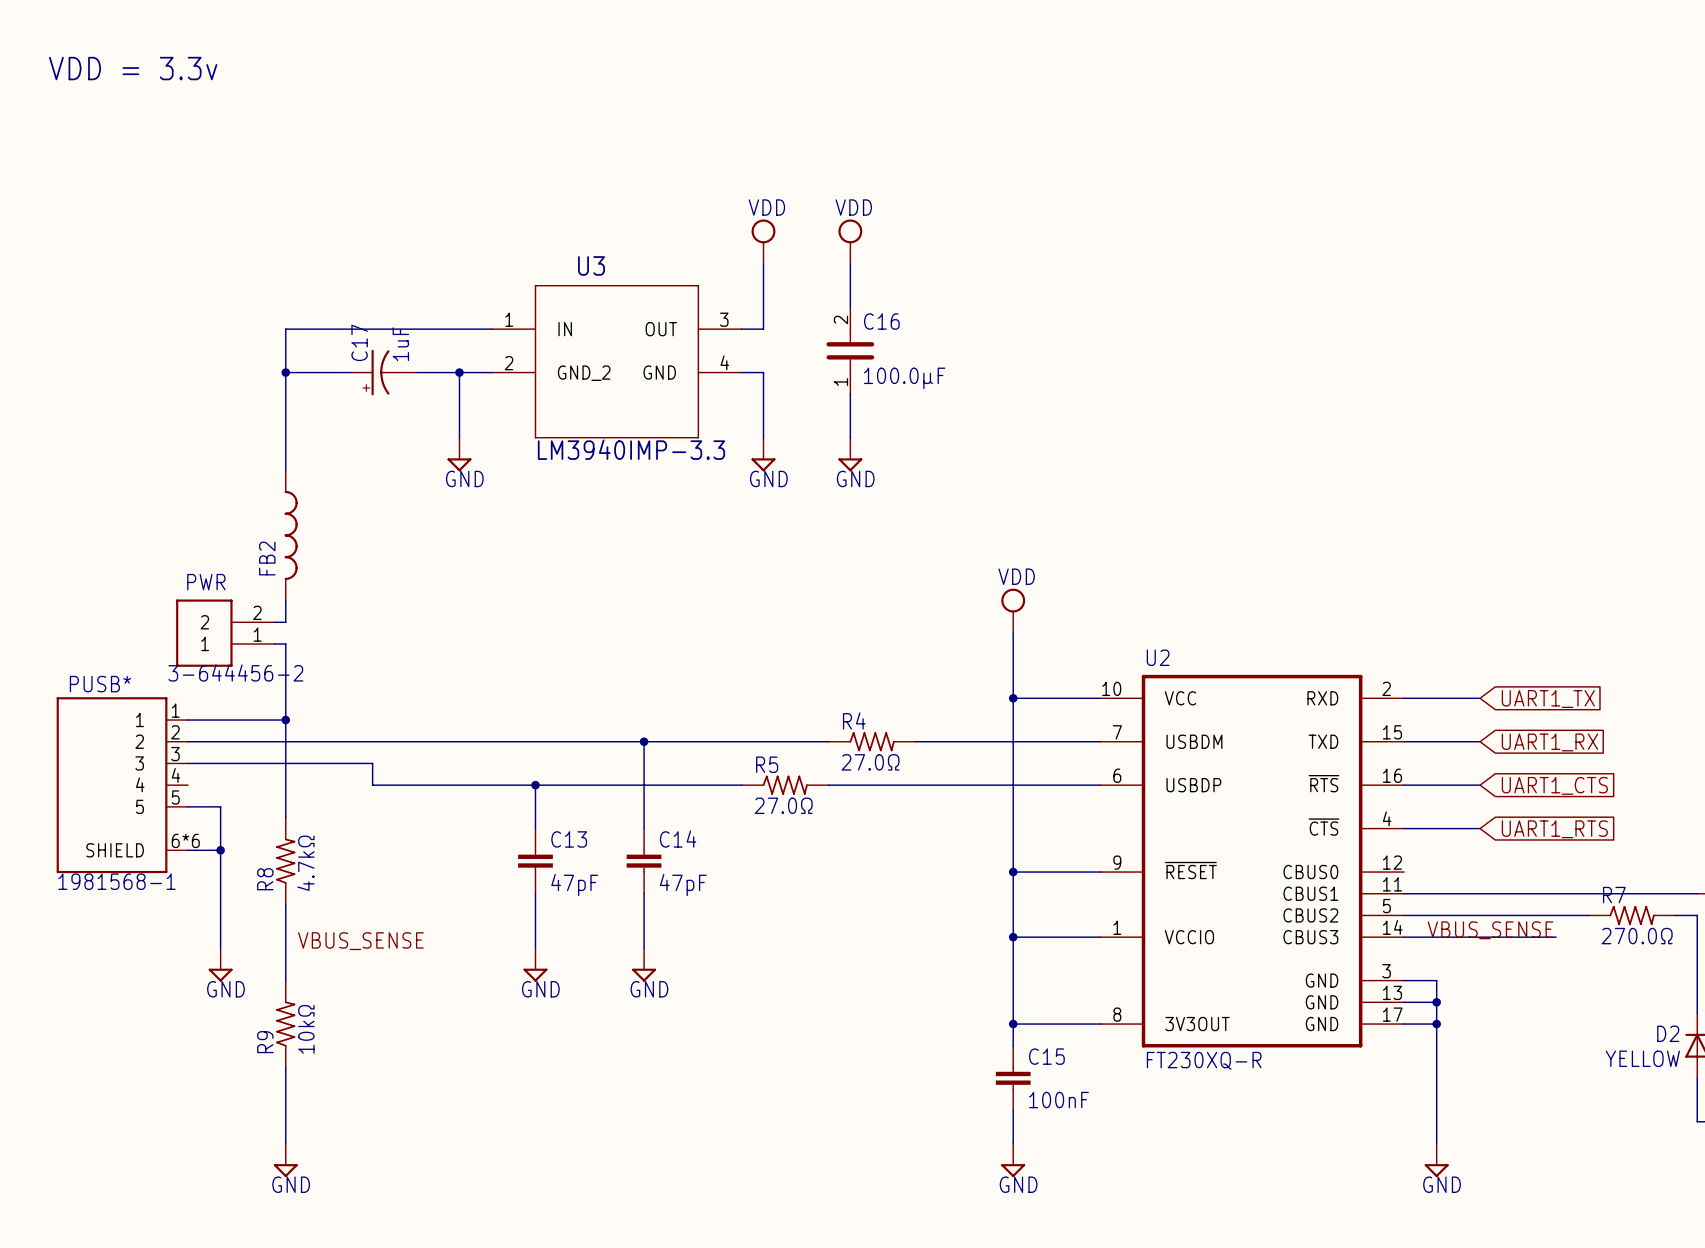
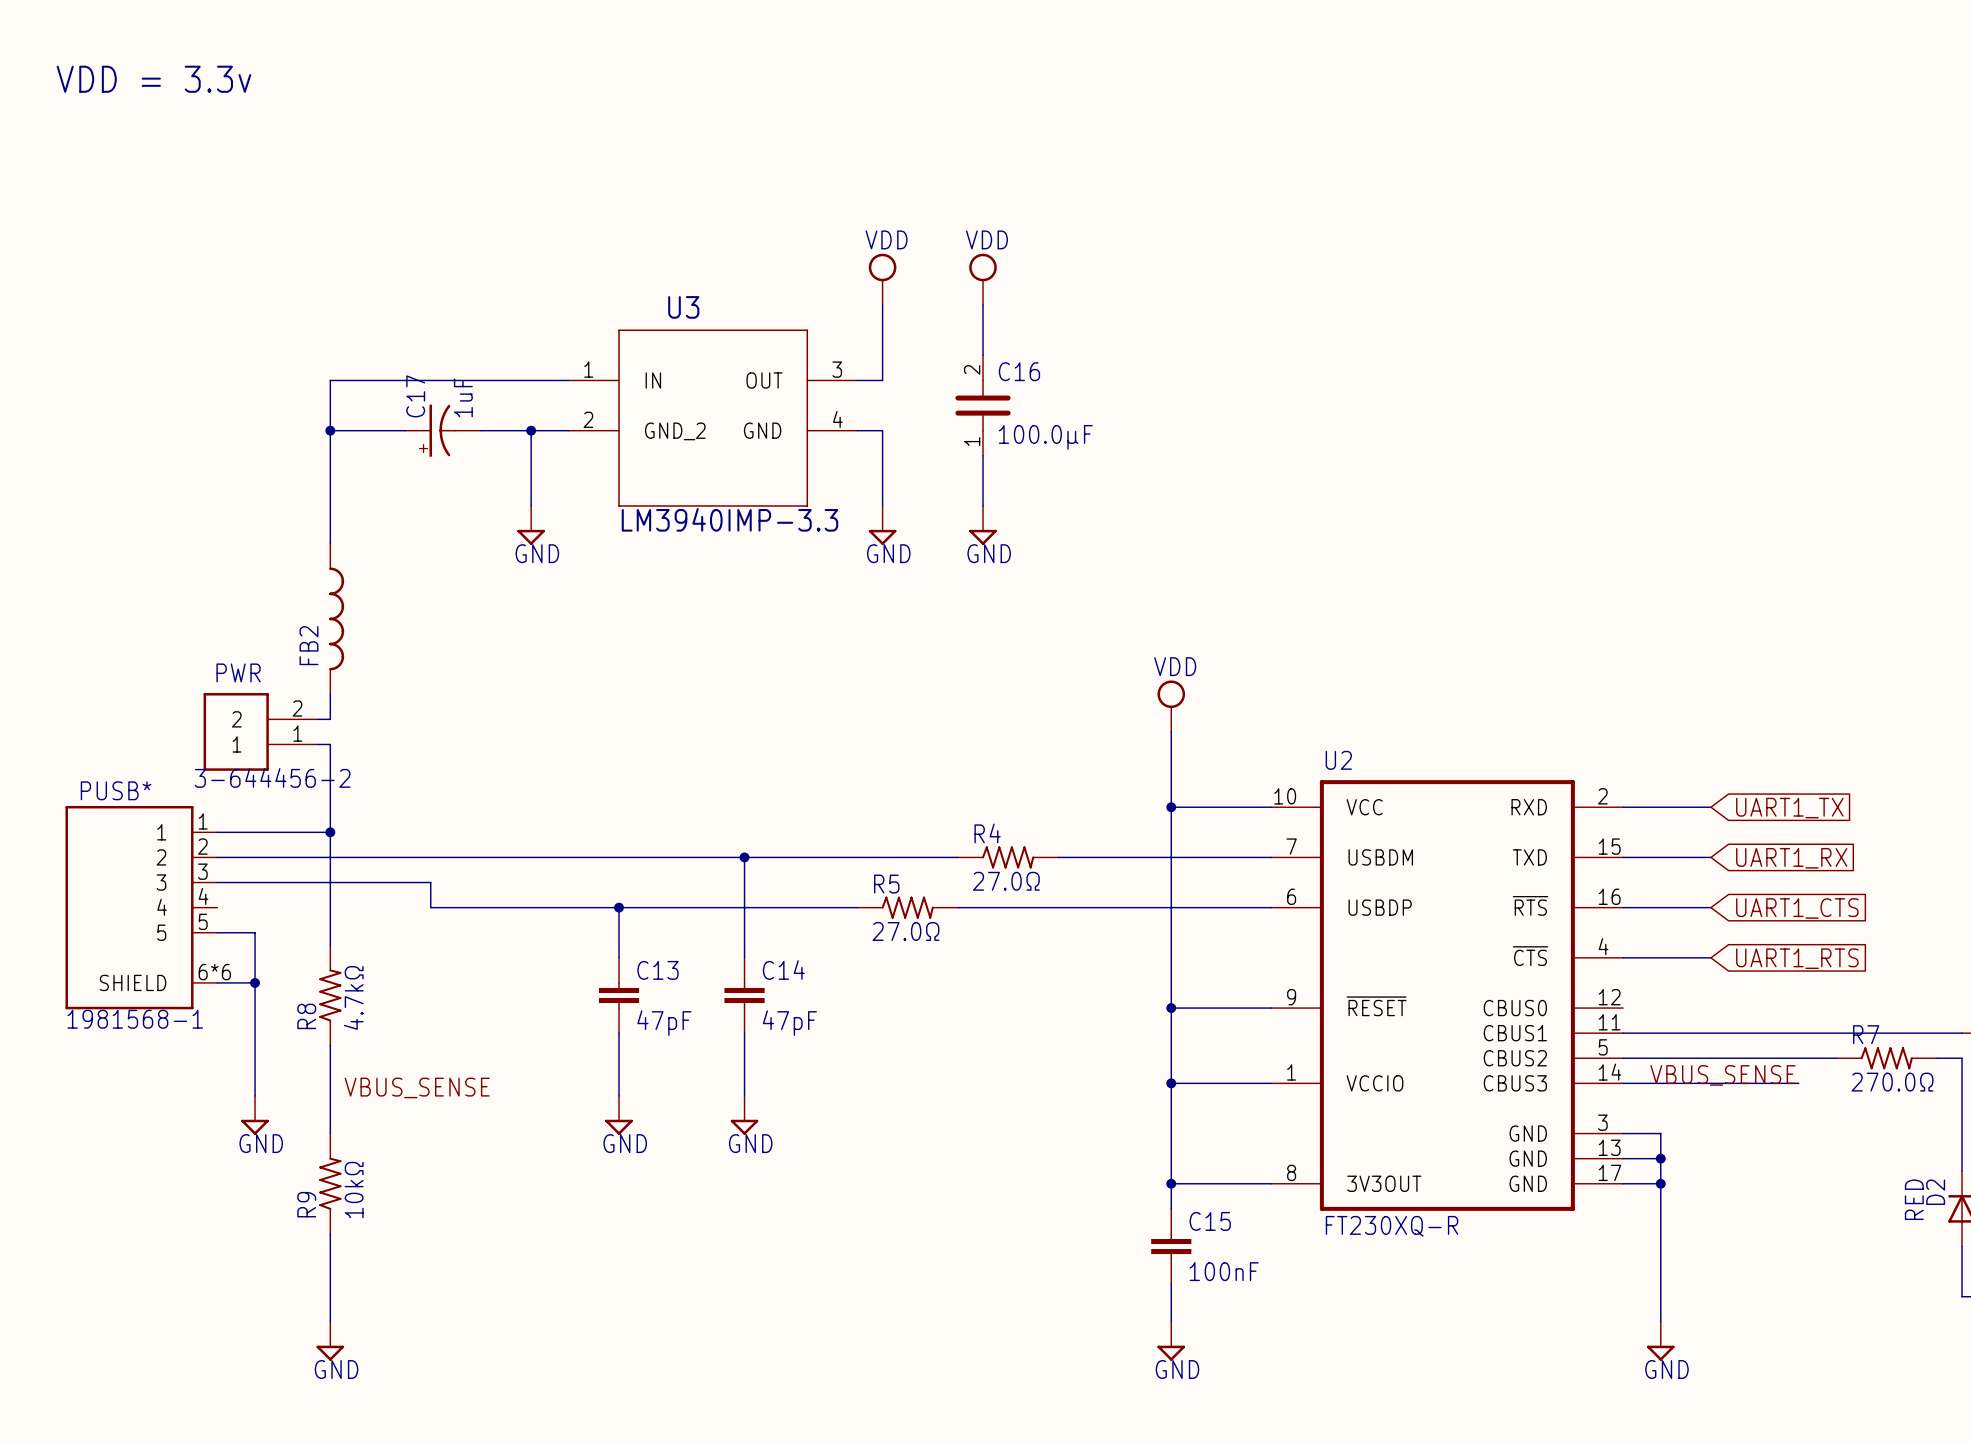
D2 name rotation: 0° (1668, 1033) -> 90° counterclockwise (1935, 1192)
D2 value: YELLOW (1642, 1058) -> RED (1914, 1199)

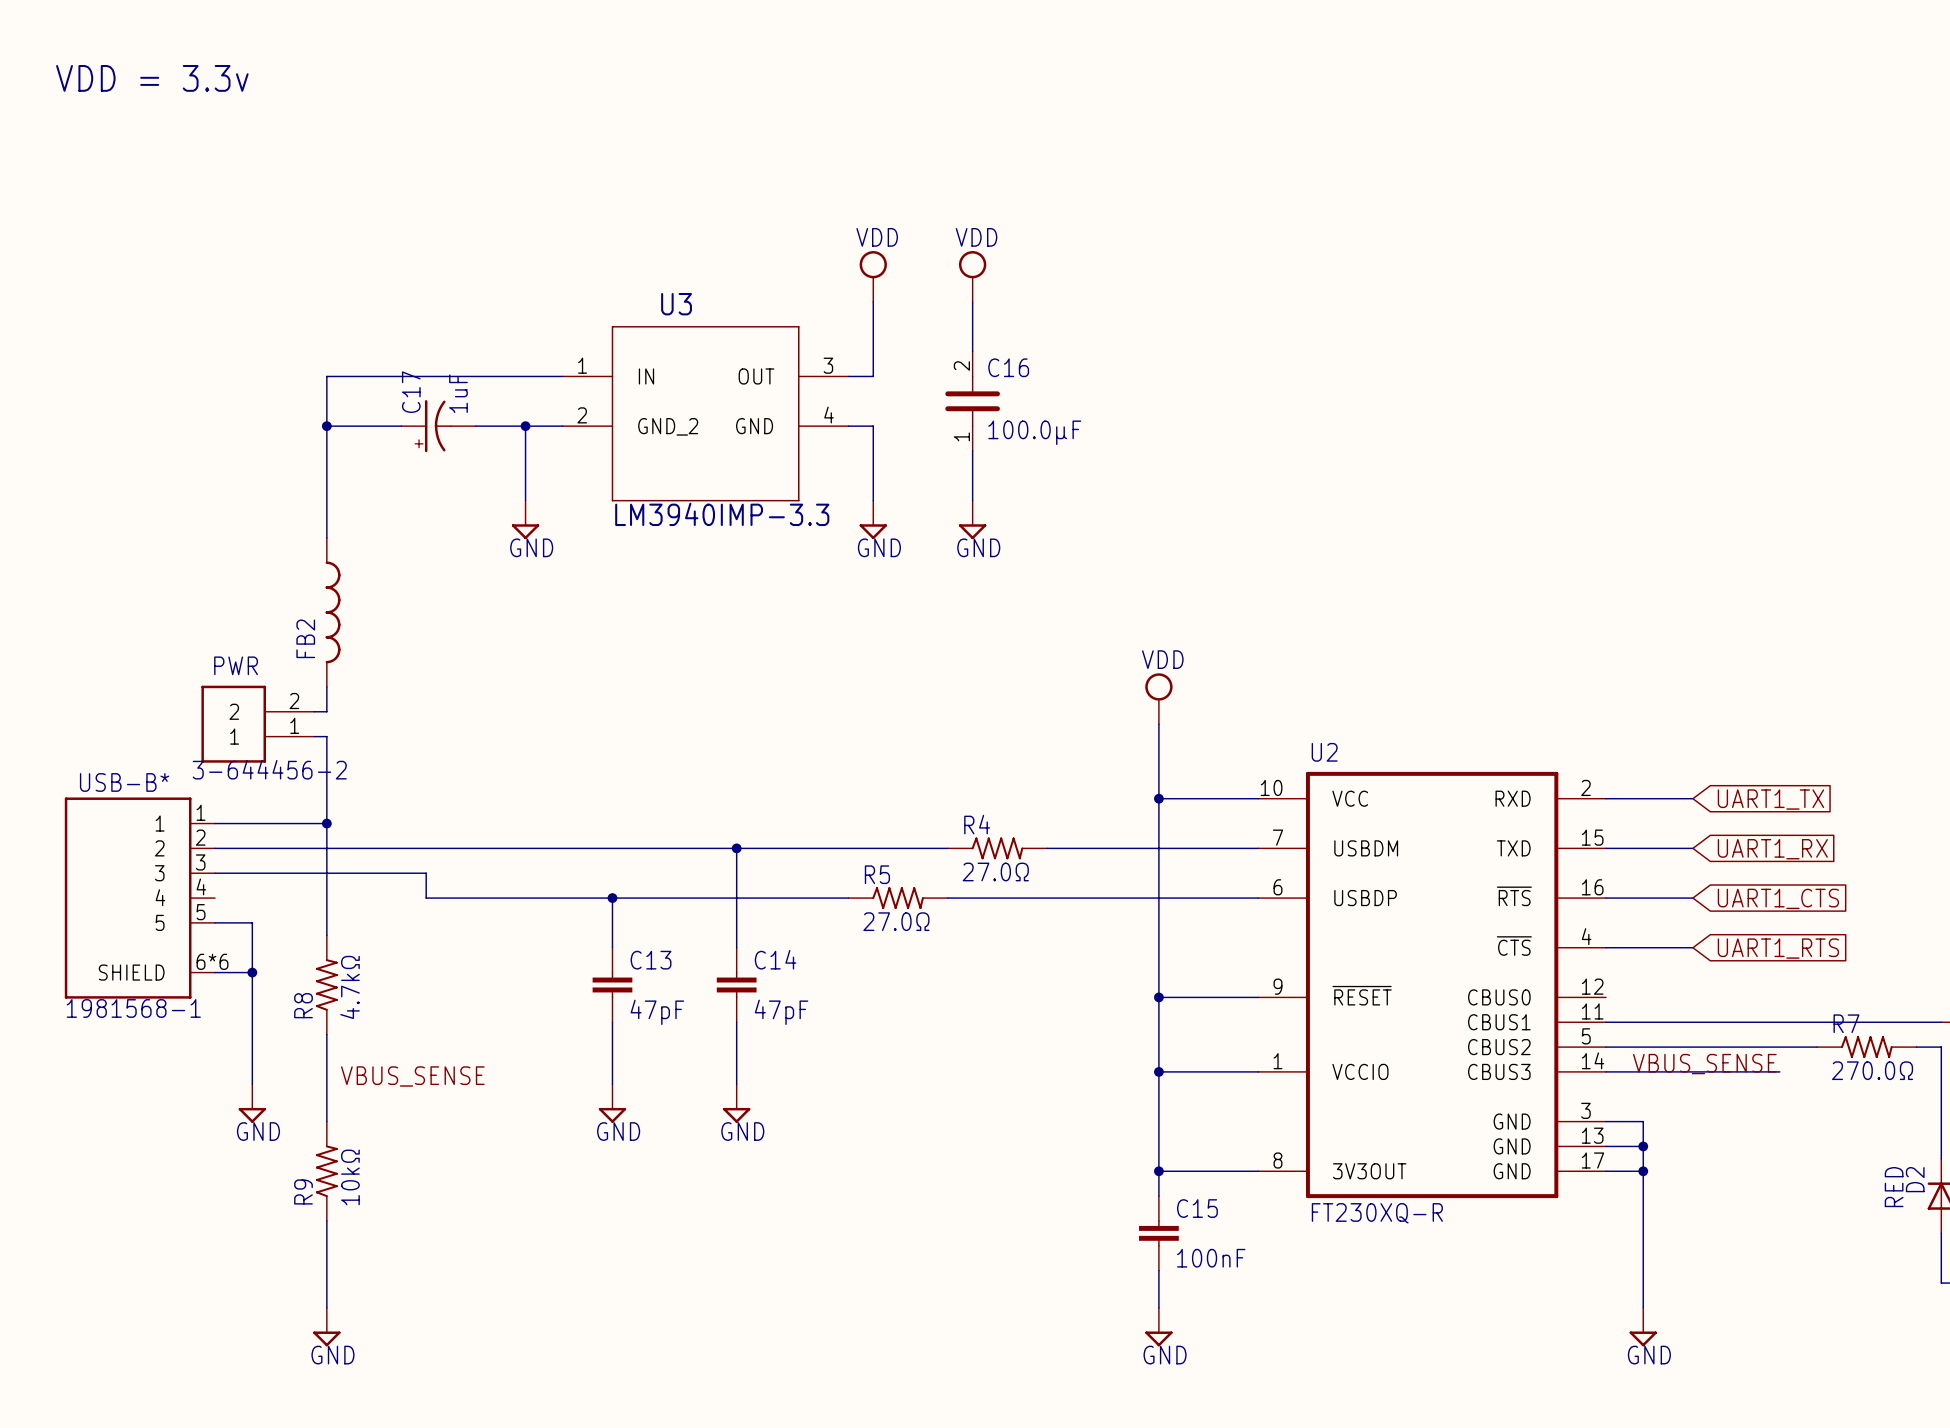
PUSB* name: PUSB* (116, 790) -> USB-B* (124, 782)

